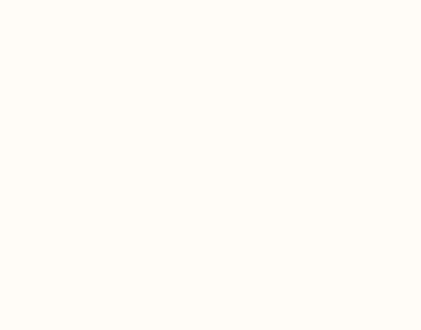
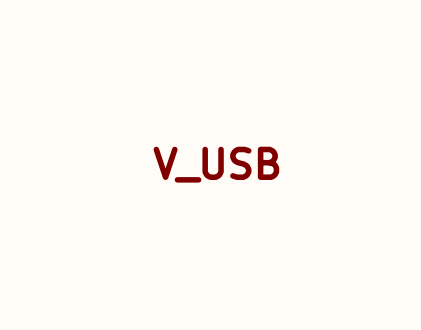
label: none -> V_USB (216, 164)

